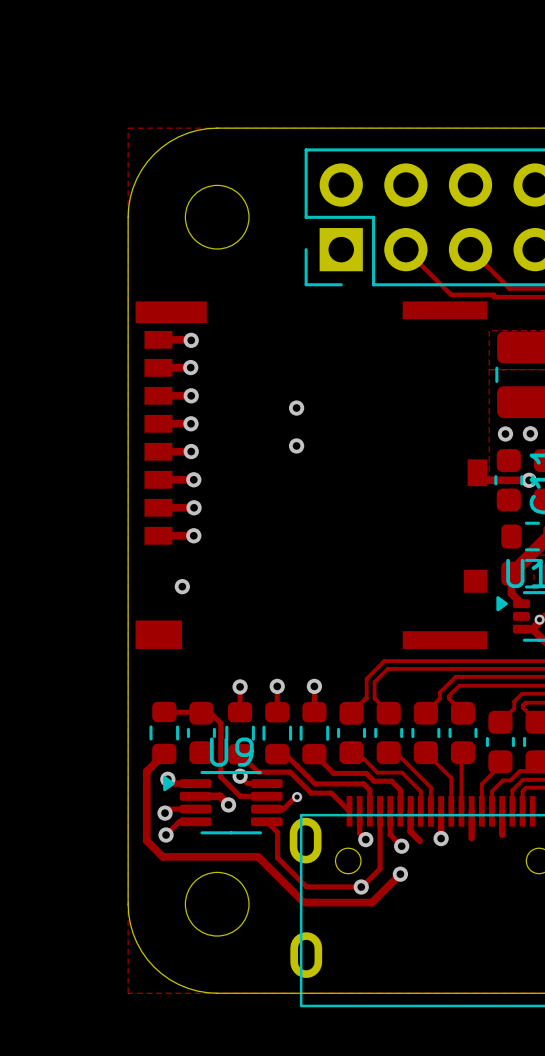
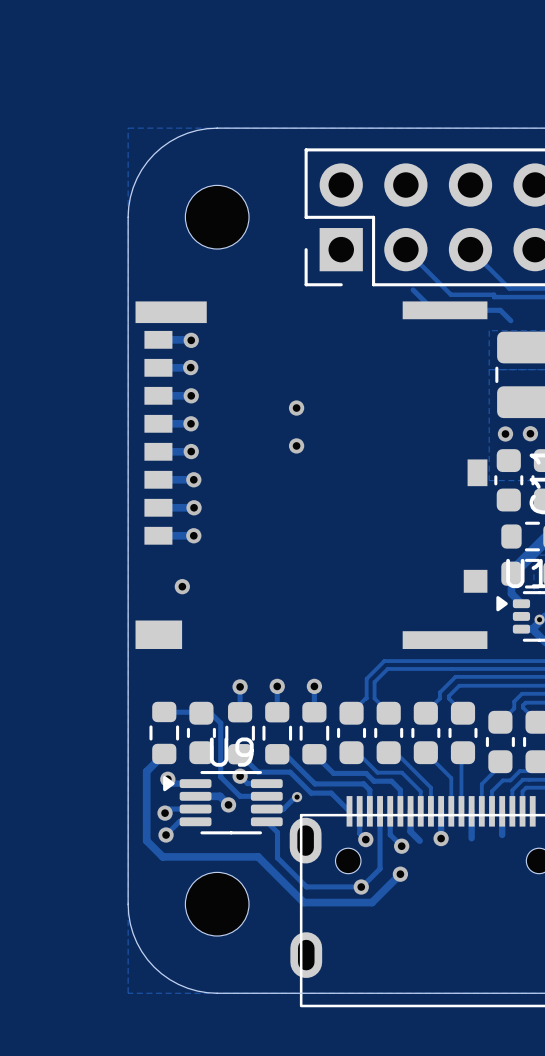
track: none -> (413, 289) (433, 310) (500, 310) (510, 320)
track: (477, 472) (485, 480) (529, 480) -> none
via: (529, 480) -> none

